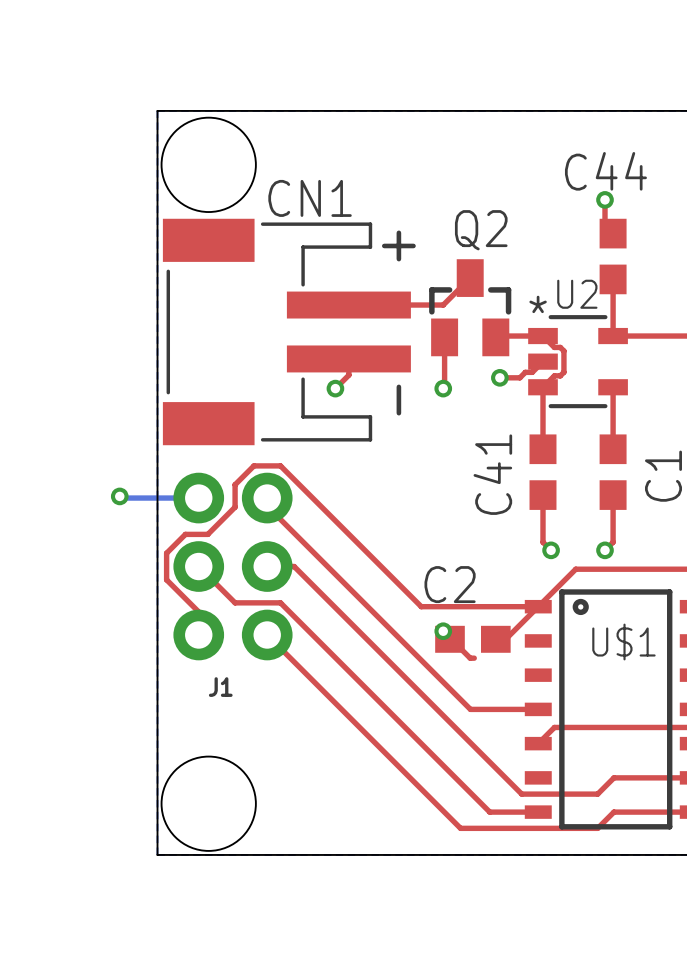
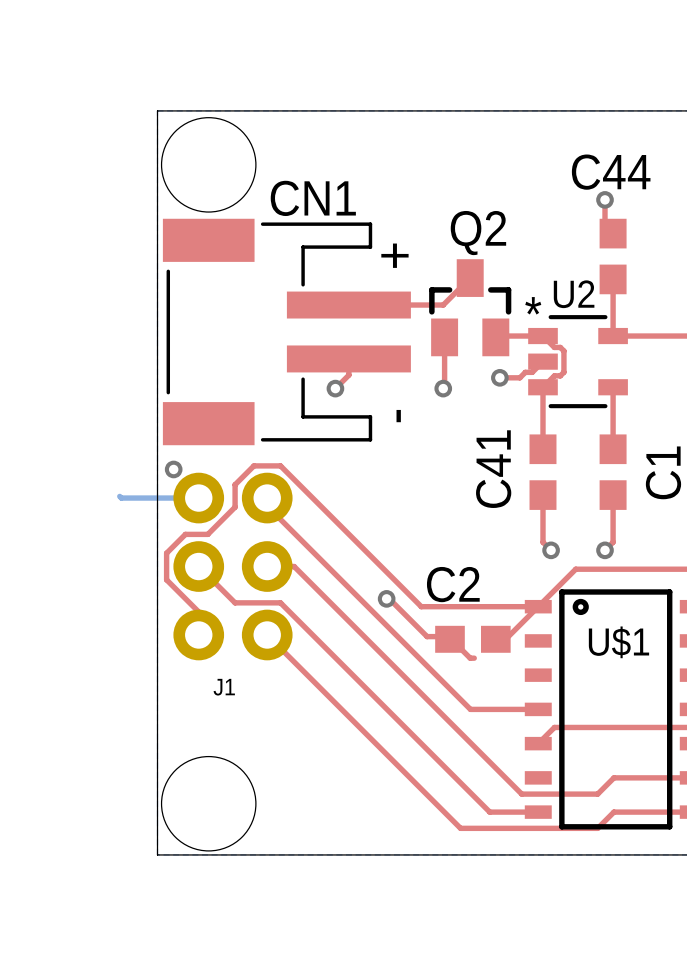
via position: (119, 496) -> (173, 469)
top track: none -> (386, 598) (389, 598) (427, 636) (447, 636) (449, 639)
via position: (443, 631) -> (386, 598)

